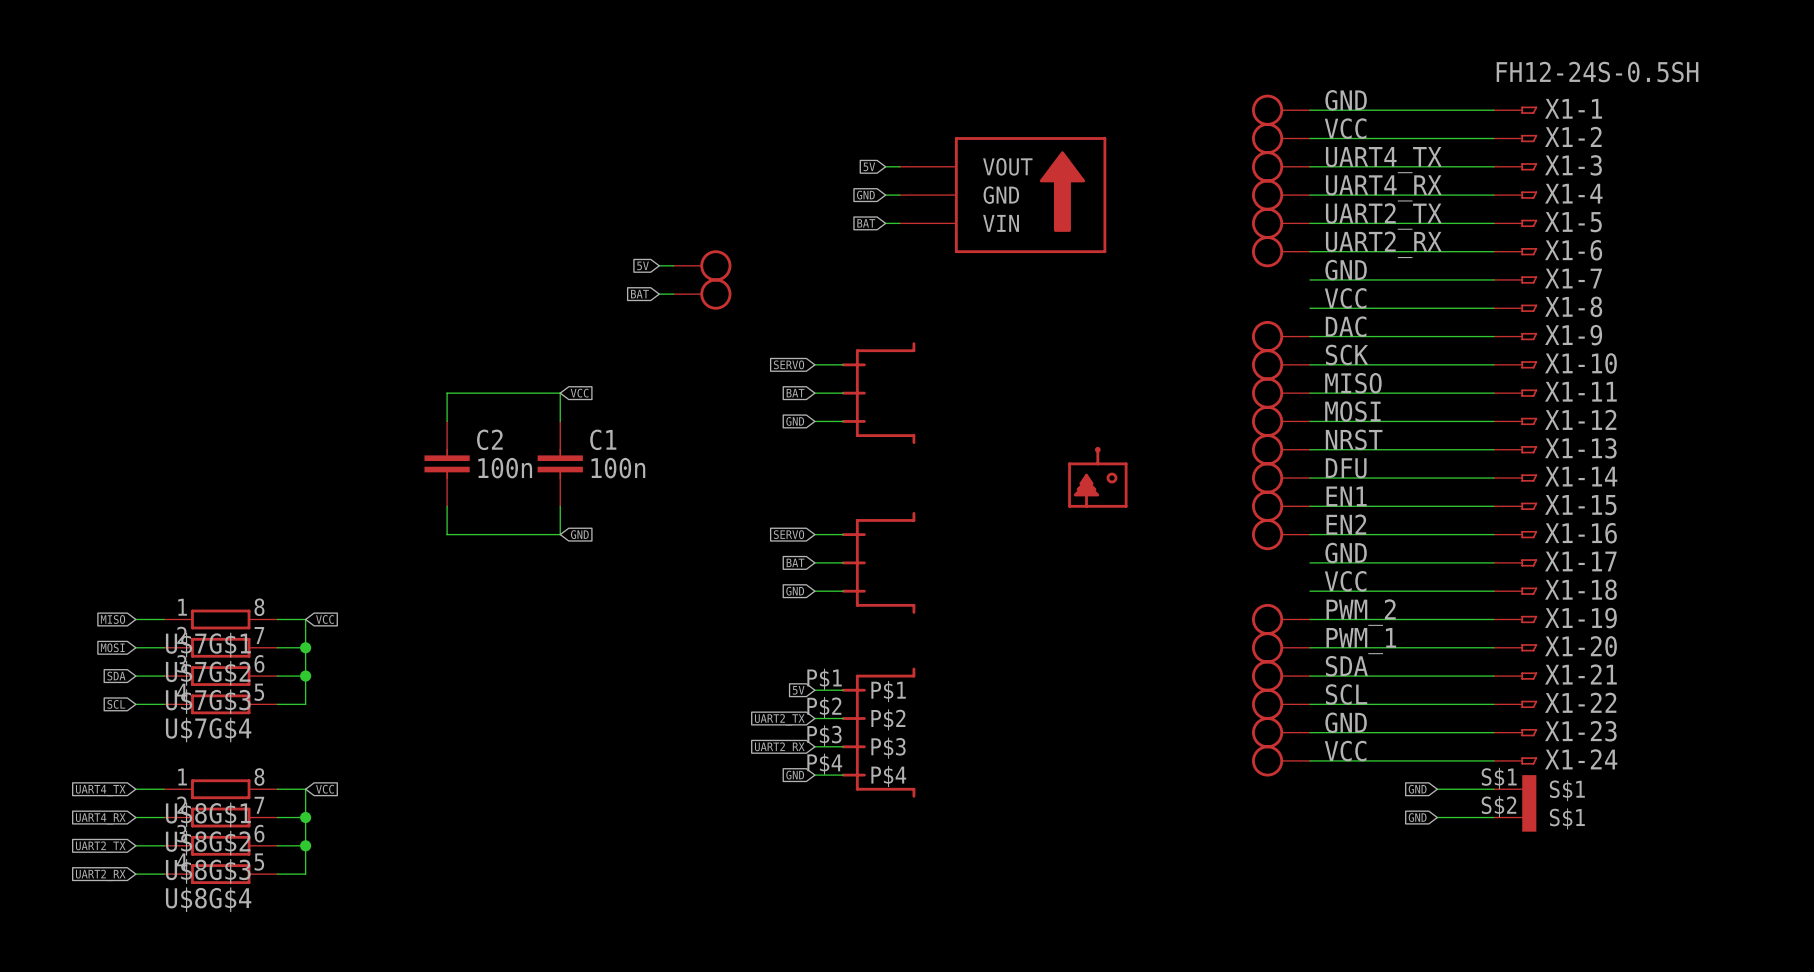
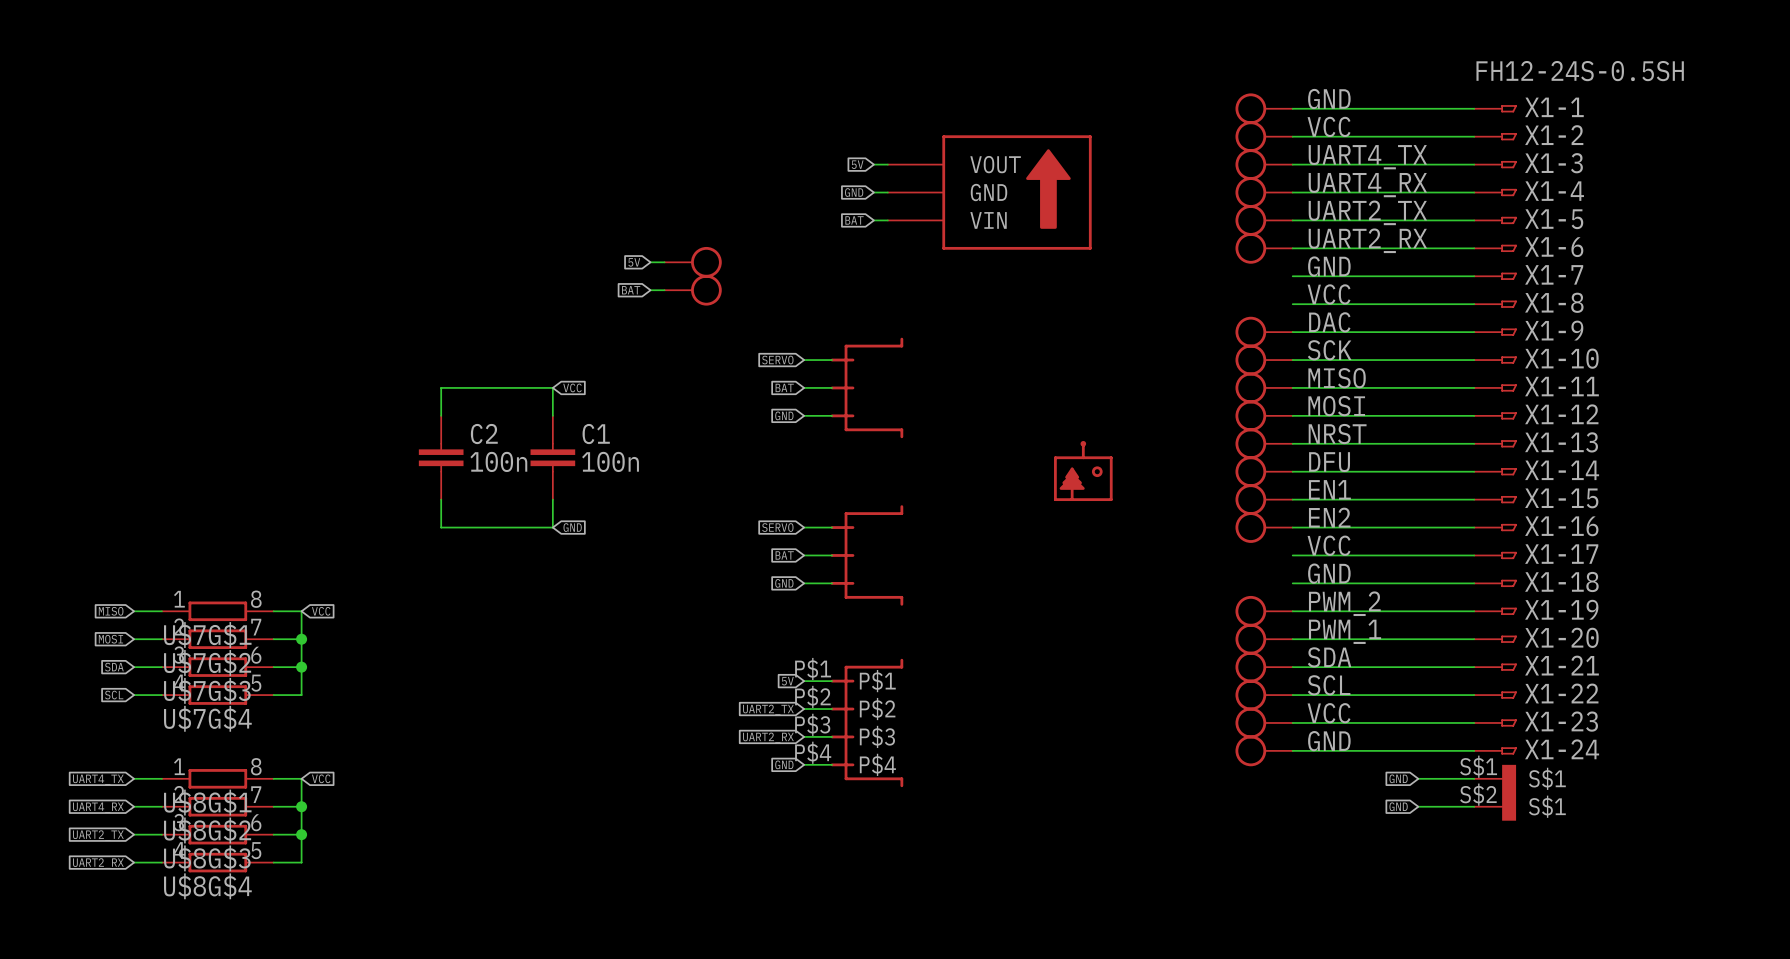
label: GND (1346, 553) -> VCC (1329, 545)
label: VCC (1345, 581) -> GND (1329, 573)
label: GND (1346, 722) -> VCC (1329, 713)
label: VCC (1345, 751) -> GND (1329, 741)

